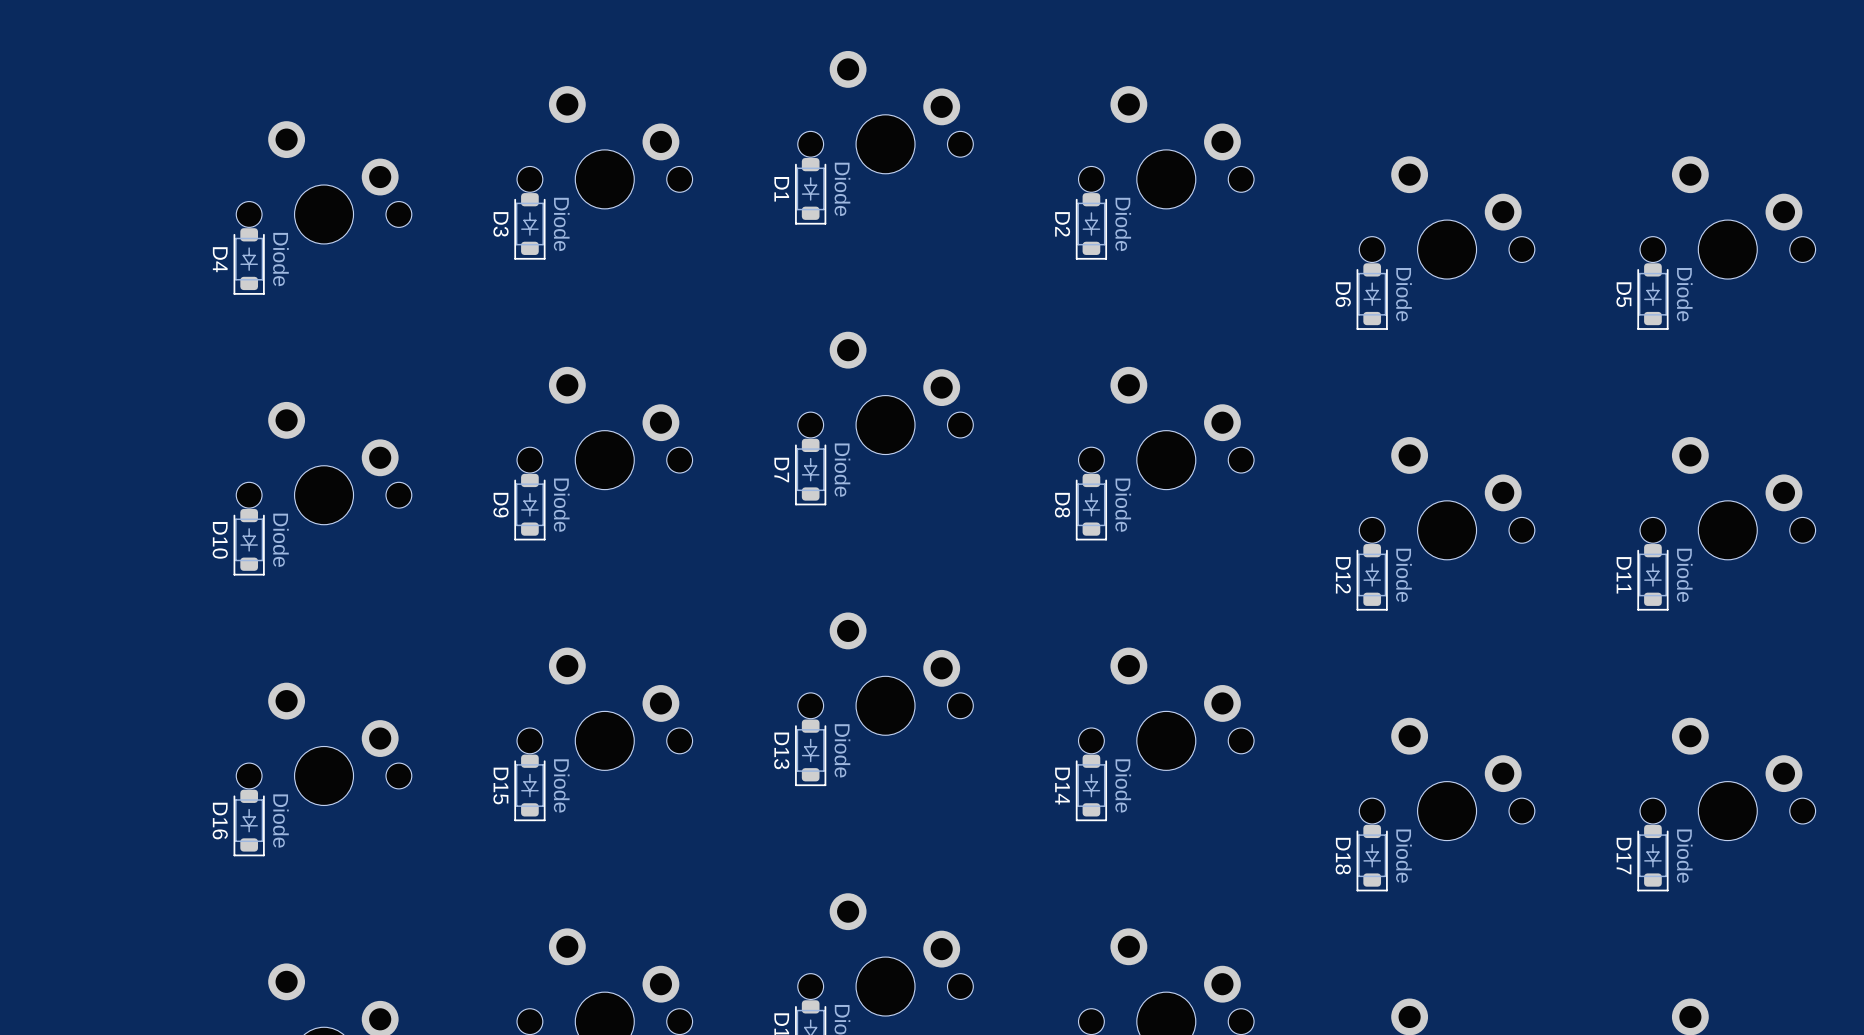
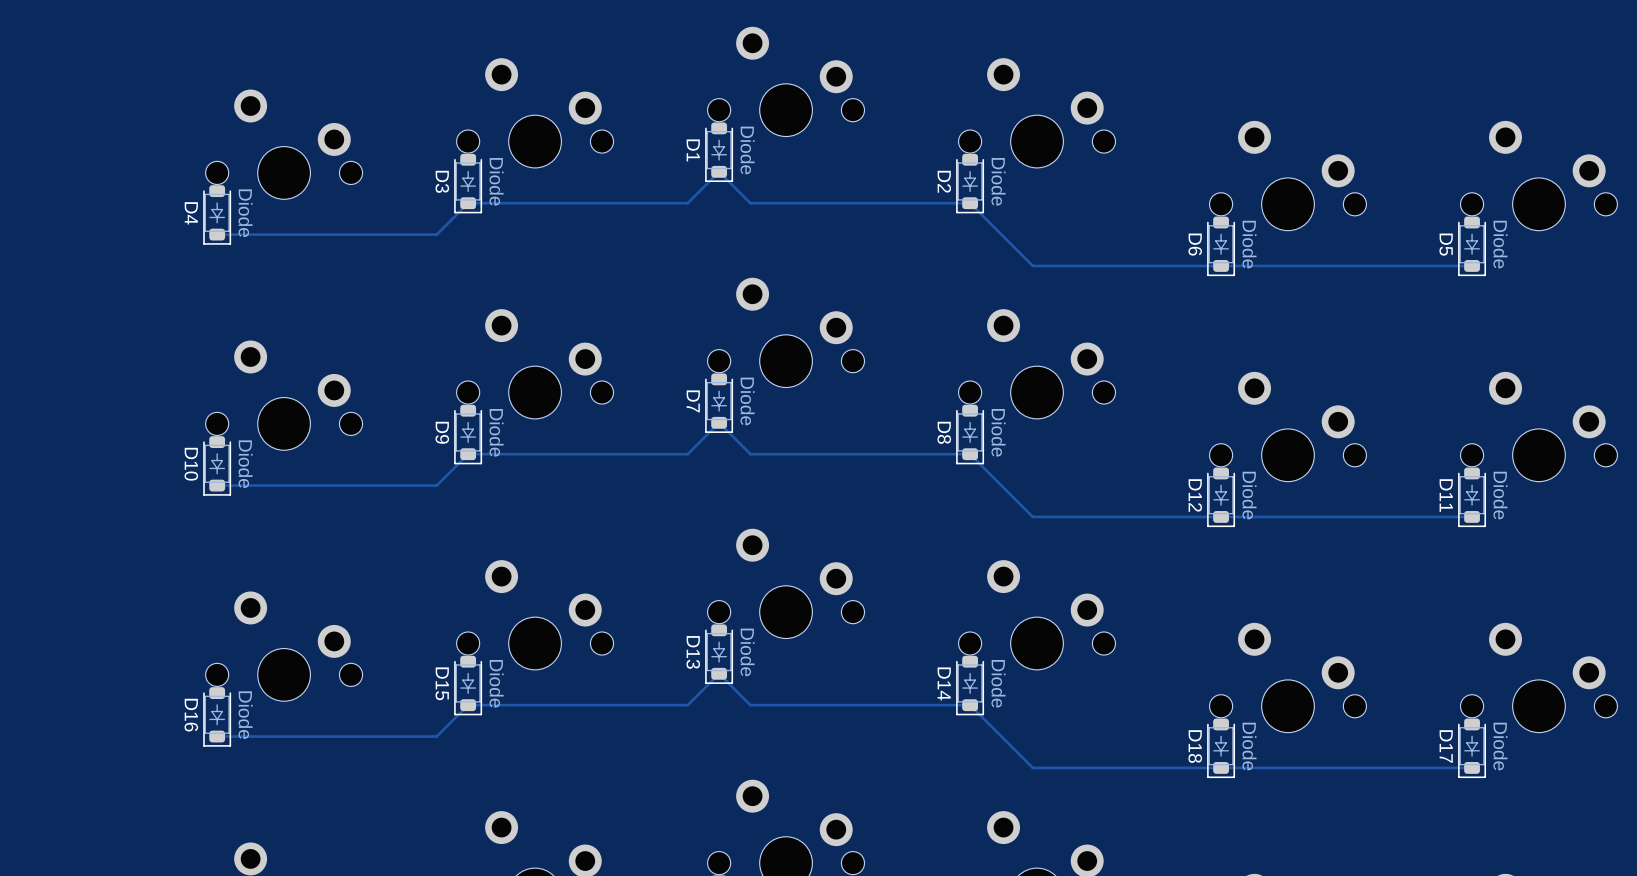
track: none -> (217, 234) (436, 234) (468, 203) (687, 203) (719, 171) (750, 203) (970, 203) (1032, 265) (1472, 265)
track: none -> (217, 485) (436, 485) (468, 454) (687, 454) (719, 422) (750, 454) (970, 454) (1032, 516) (1472, 516)
track: none -> (217, 736) (436, 736) (468, 705) (687, 705) (719, 673) (750, 705) (970, 705) (1032, 767) (1472, 767)

